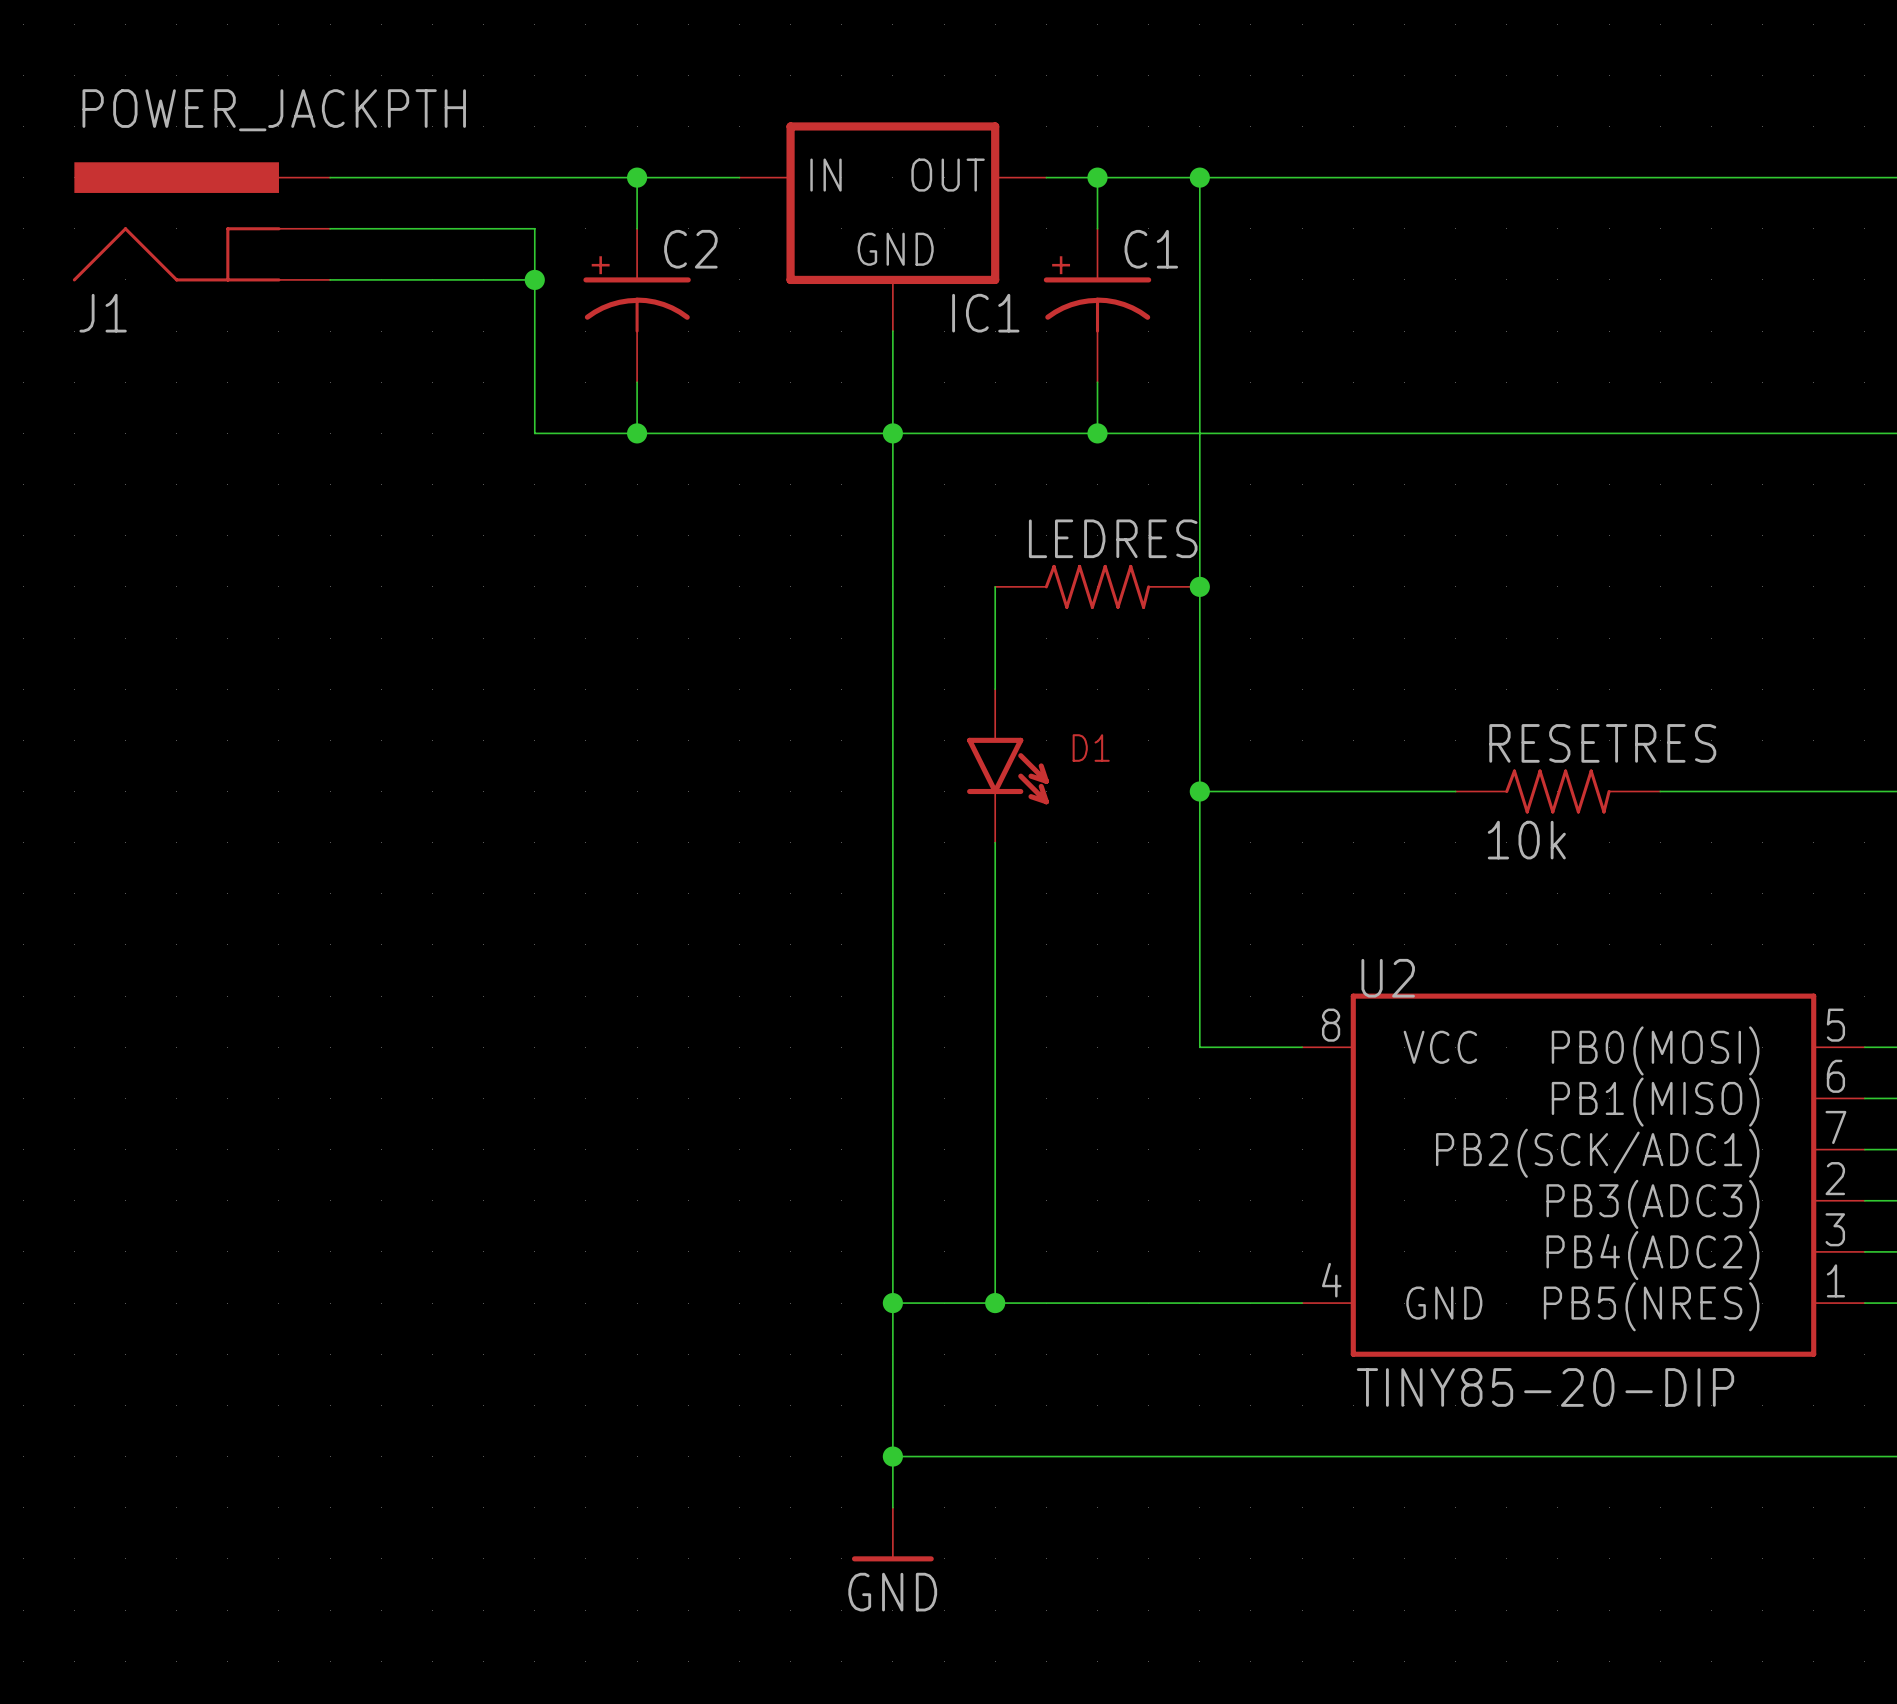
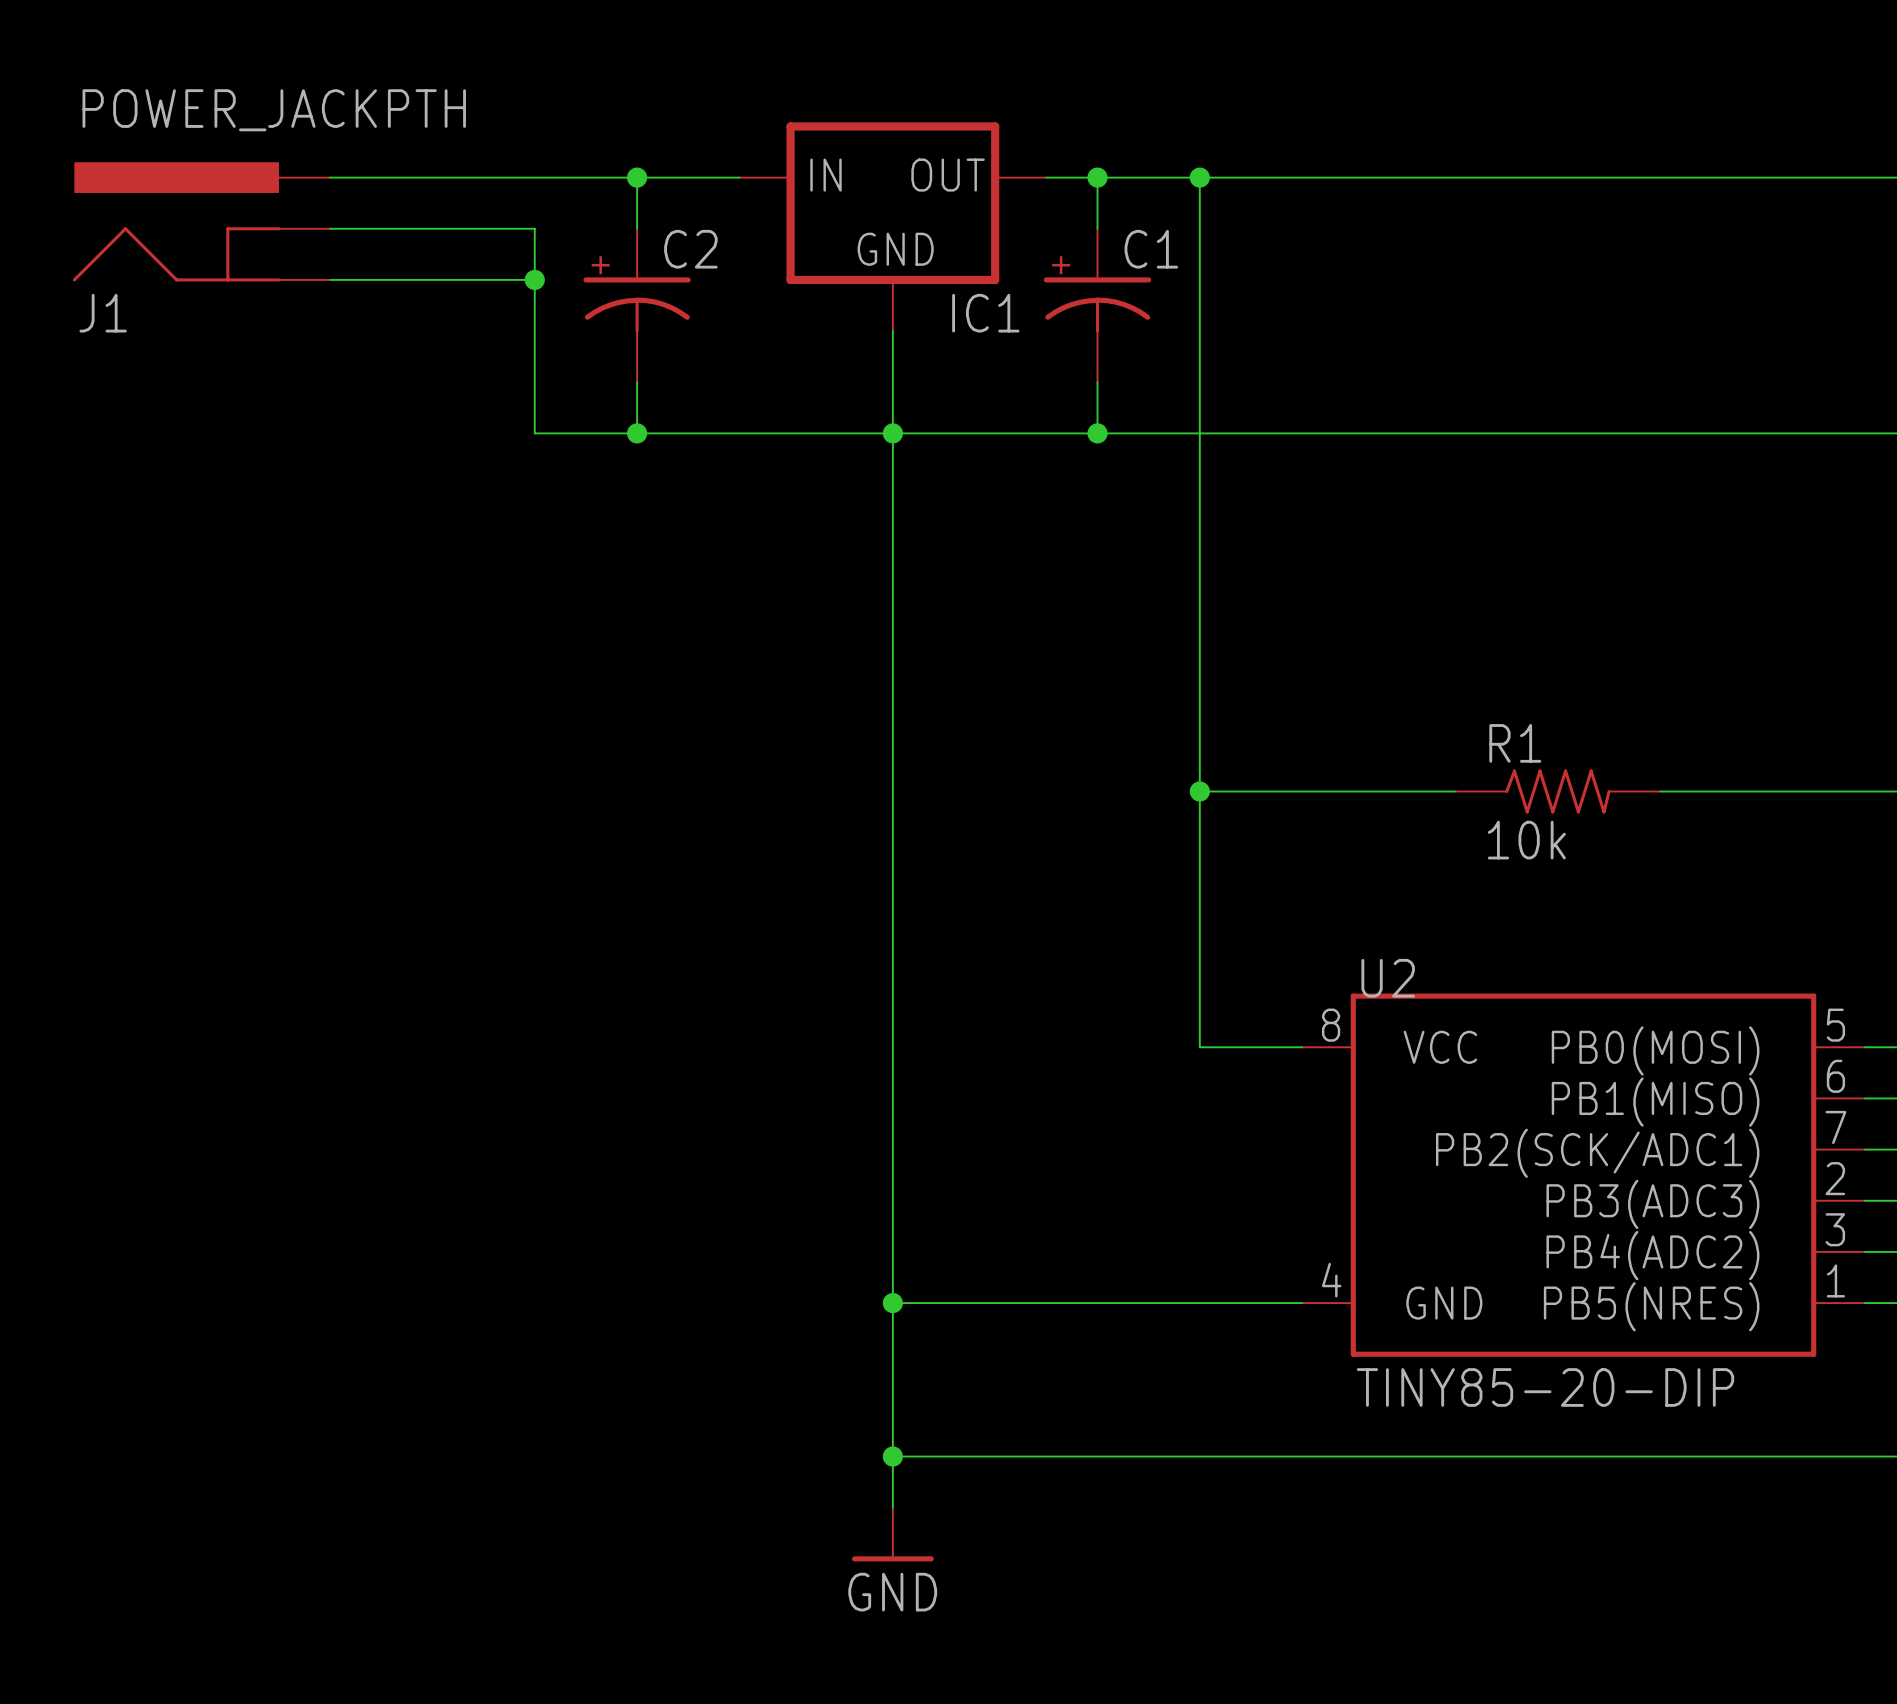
wire: (995, 586) (995, 689) -> none
LEDRES: (1097, 586) -> none
junction: (1199, 586) -> none
RESETRES name: RESETRES (1602, 743) -> R1 (1515, 743)
D1: (1007, 765) -> none
wire: (995, 842) (995, 1303) -> none
junction: (995, 1303) -> none

